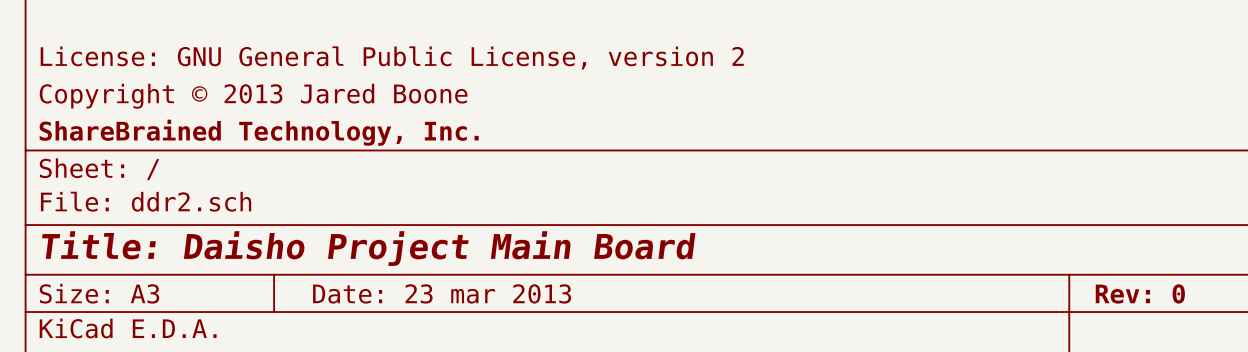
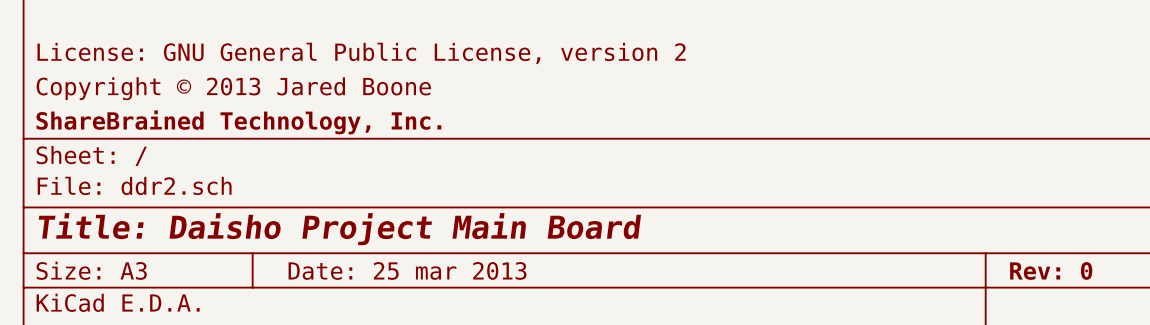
title block: Date: 23 mar 2013 (442, 293) -> Date: 25 mar 2013 (407, 270)

